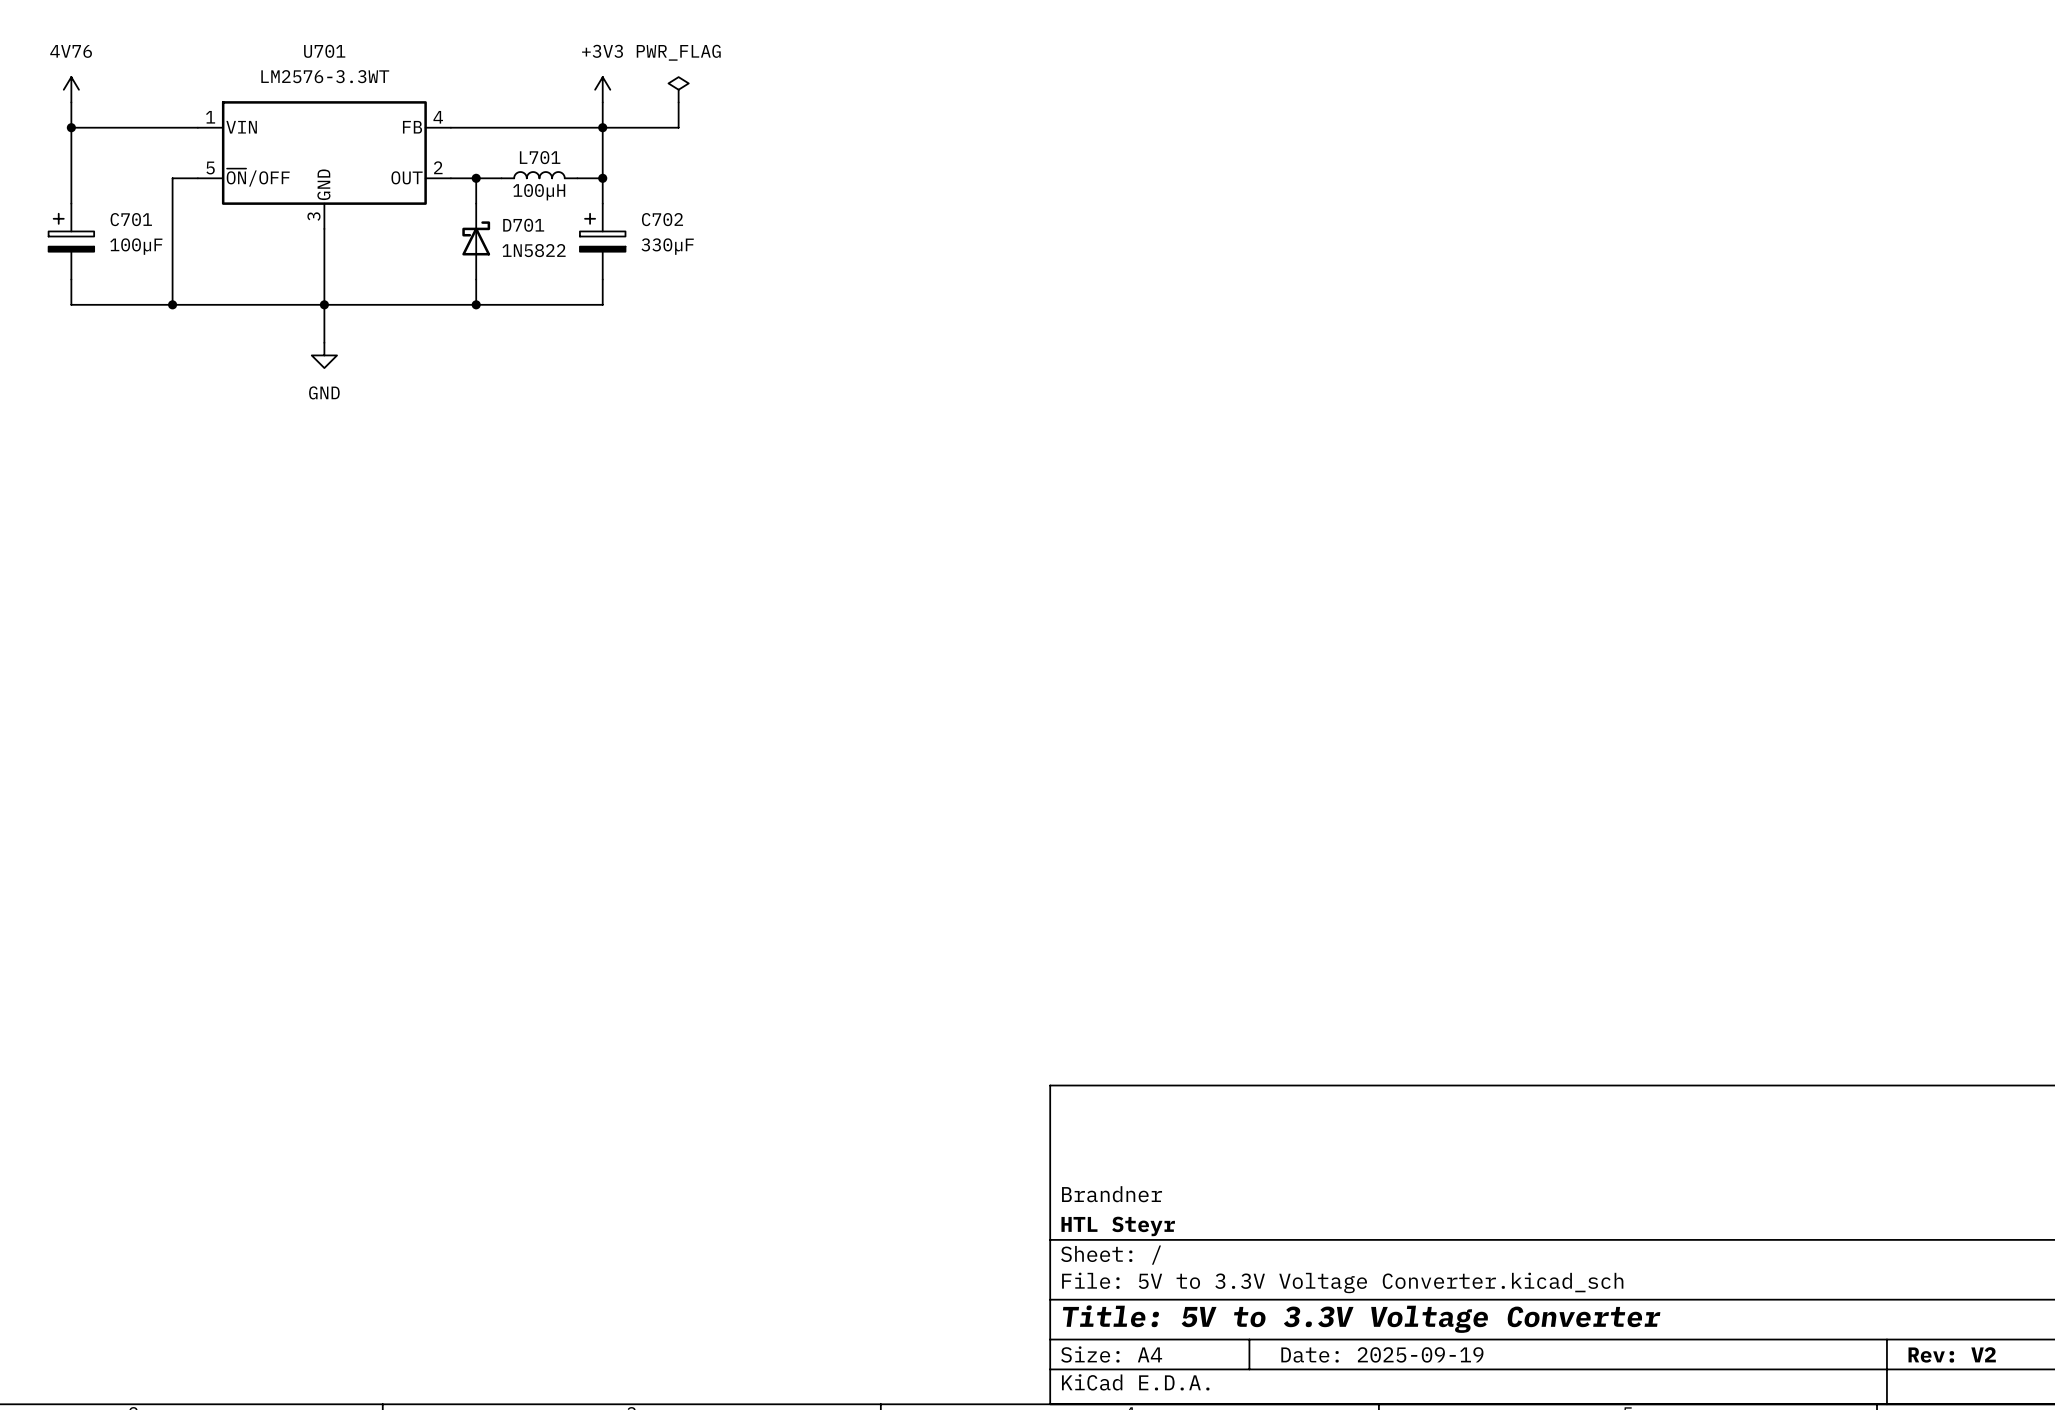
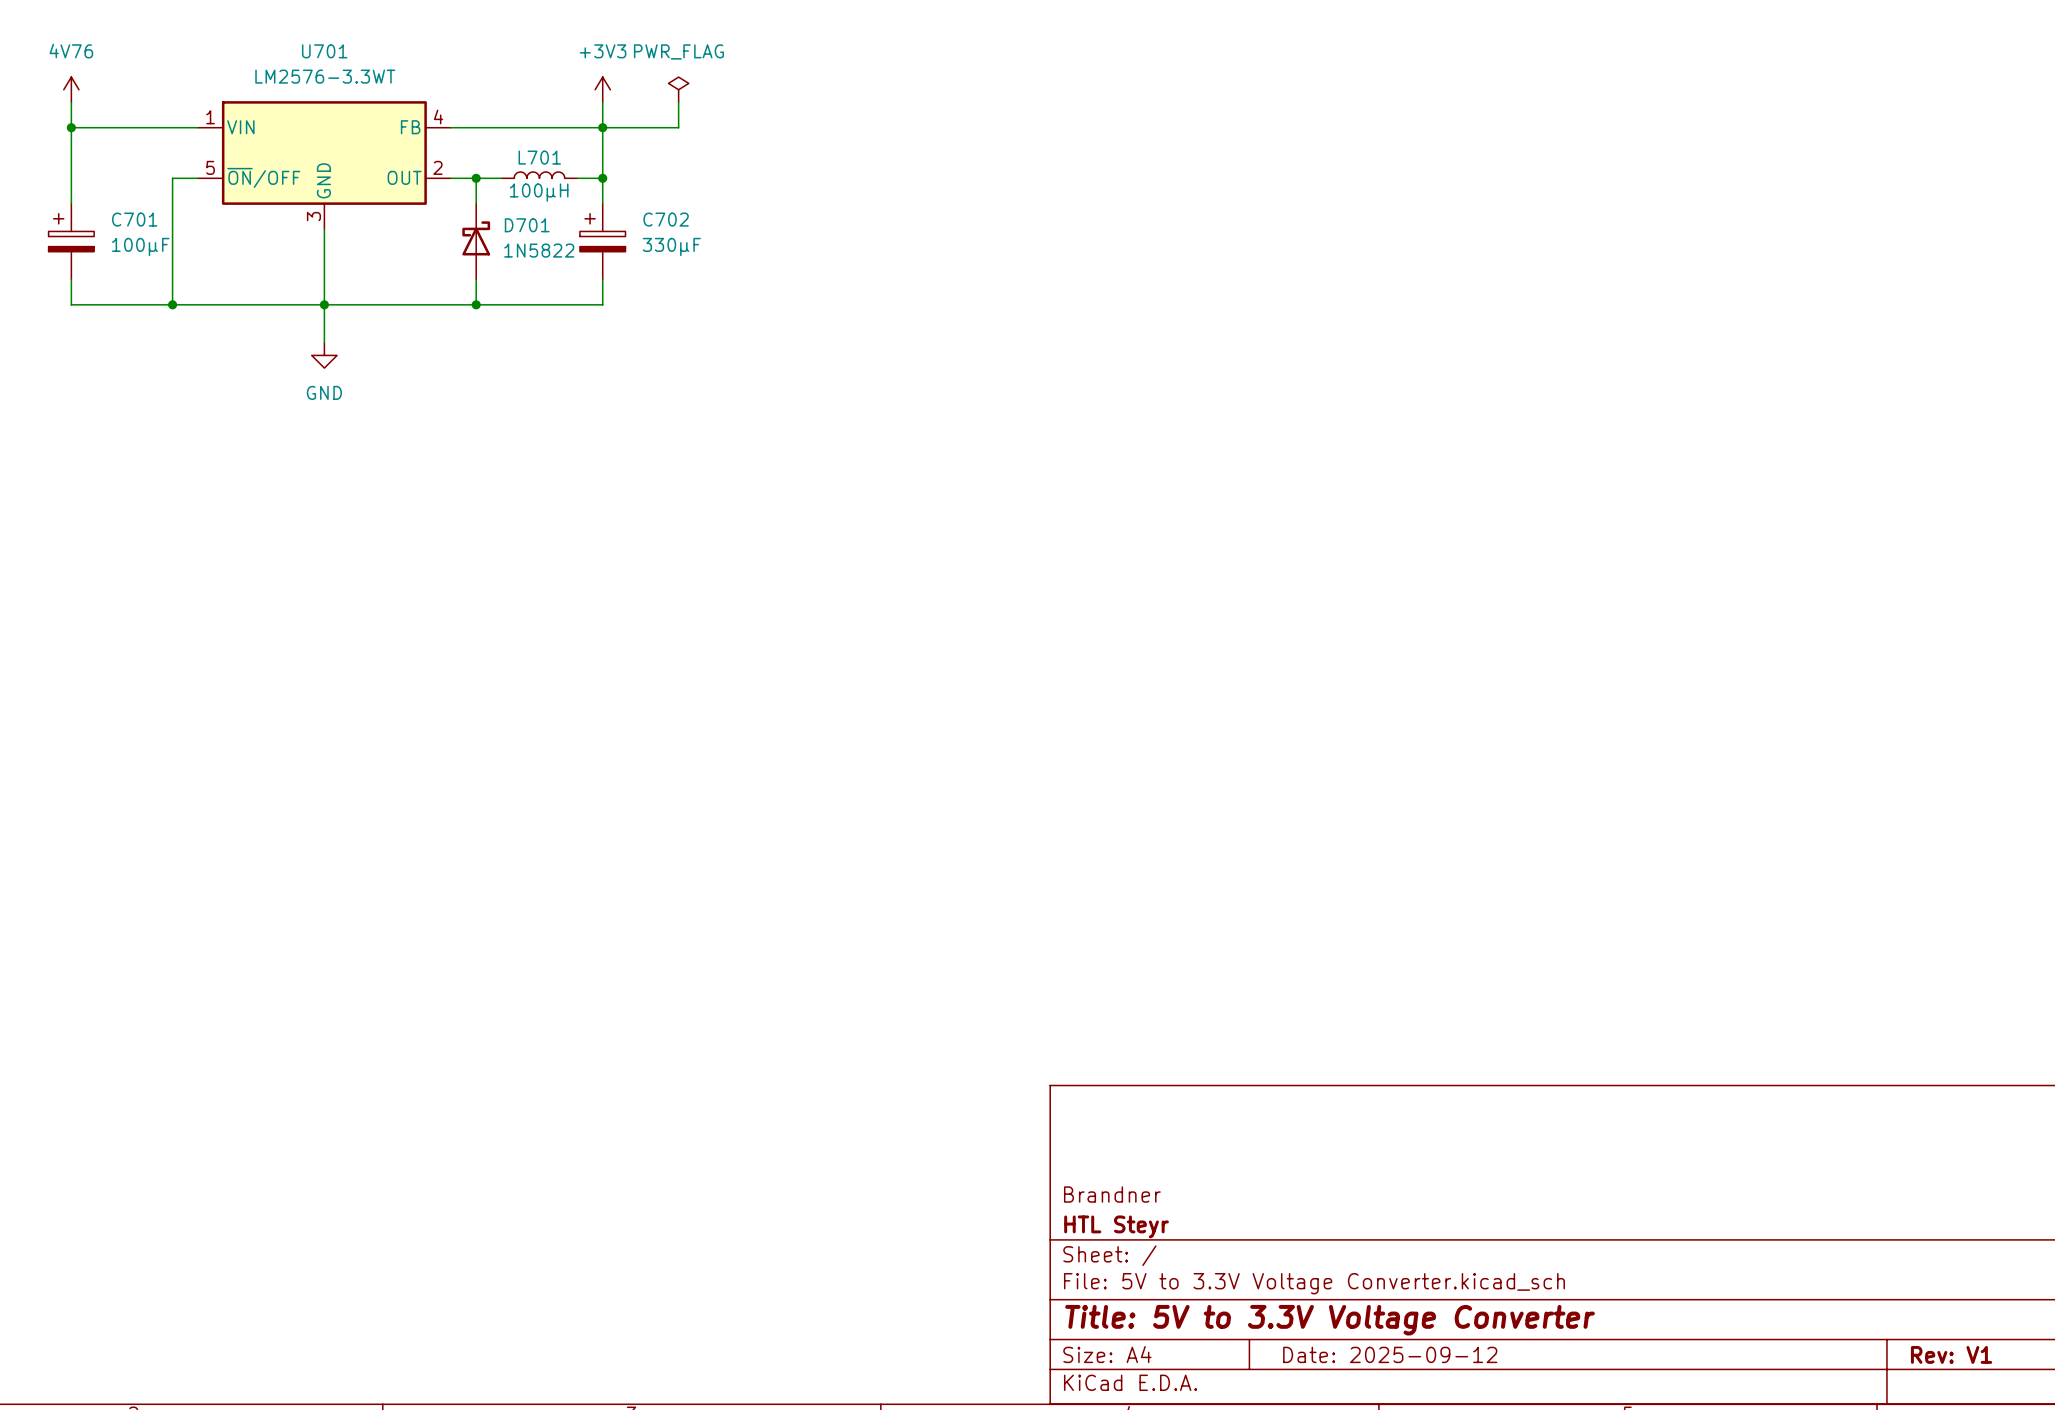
title block: Date: 2025-09-19 (1382, 1354) -> Date: 2025-09-12 (1390, 1354)
title block: Rev: V2 (1952, 1354) -> Rev: V1 (1951, 1354)

